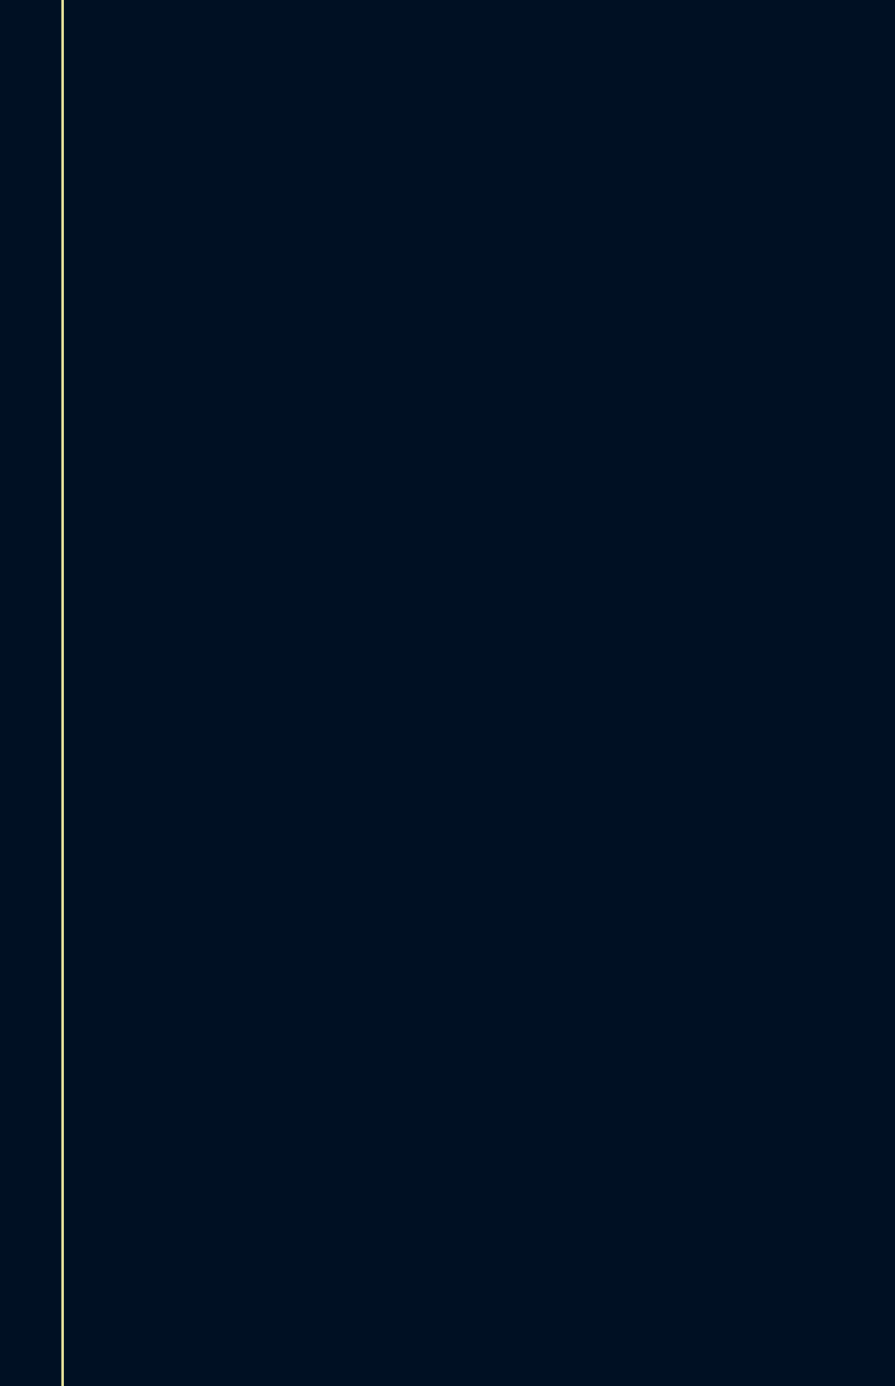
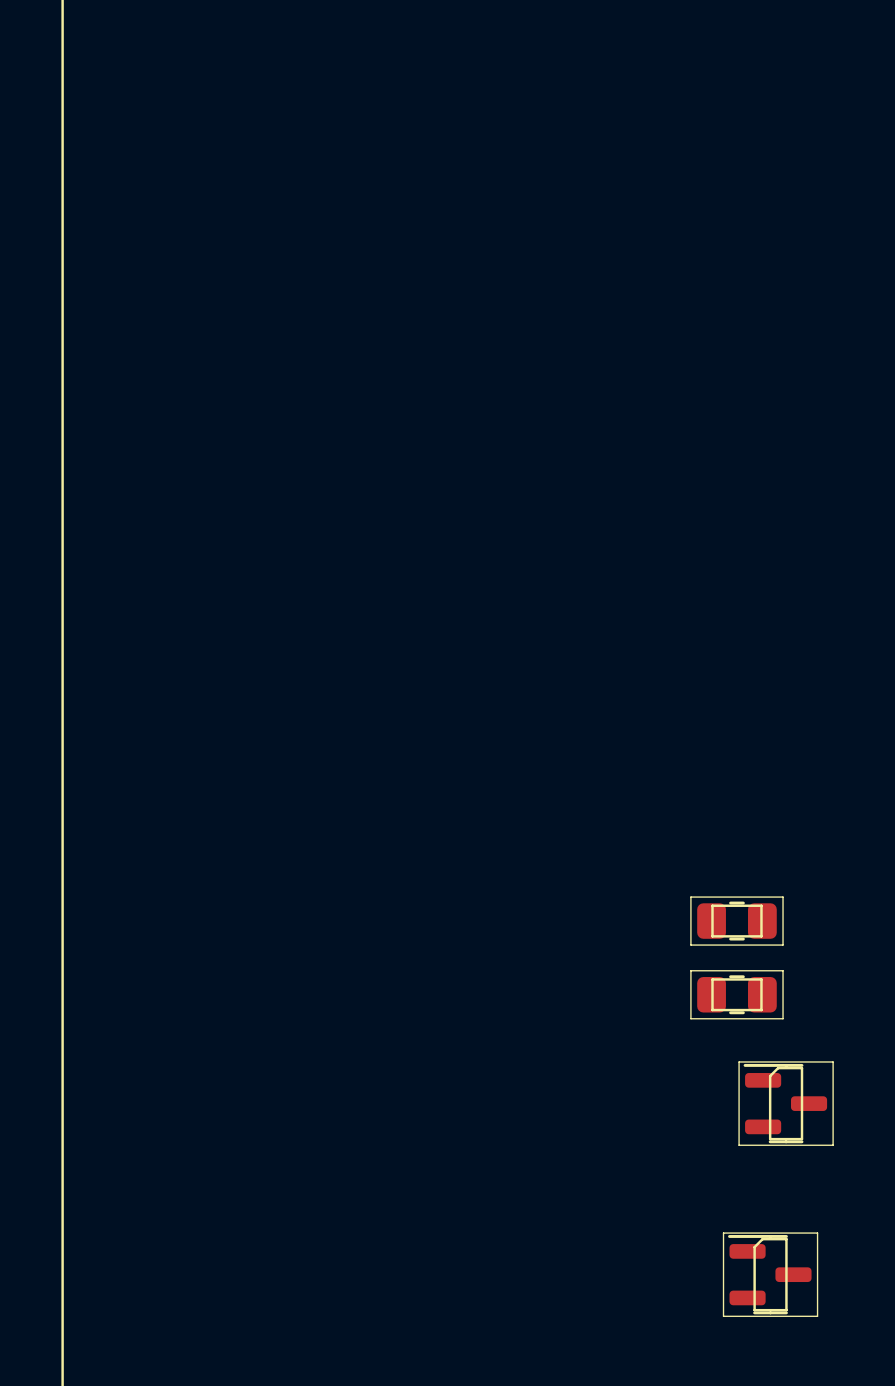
part: none -> (736, 921)
part: none -> (736, 994)
part: none -> (786, 1103)
part: none -> (770, 1274)

